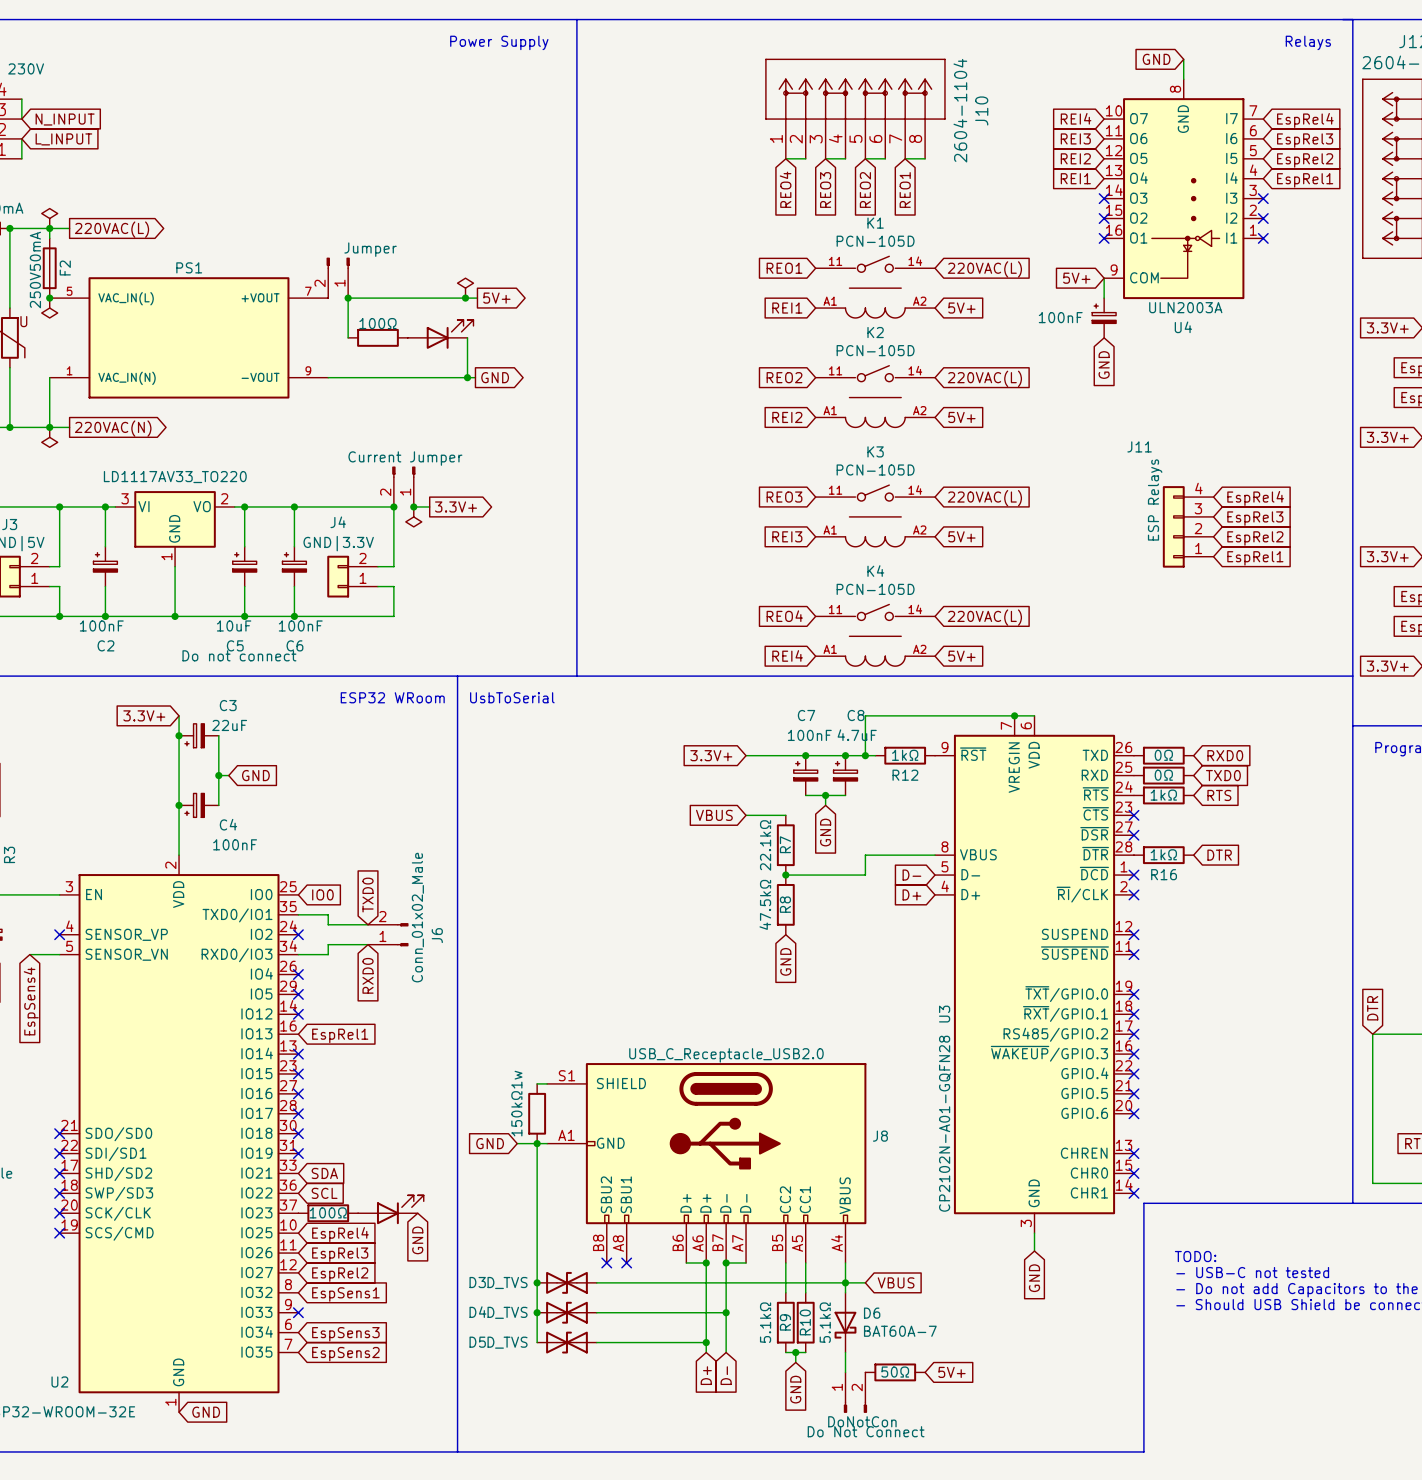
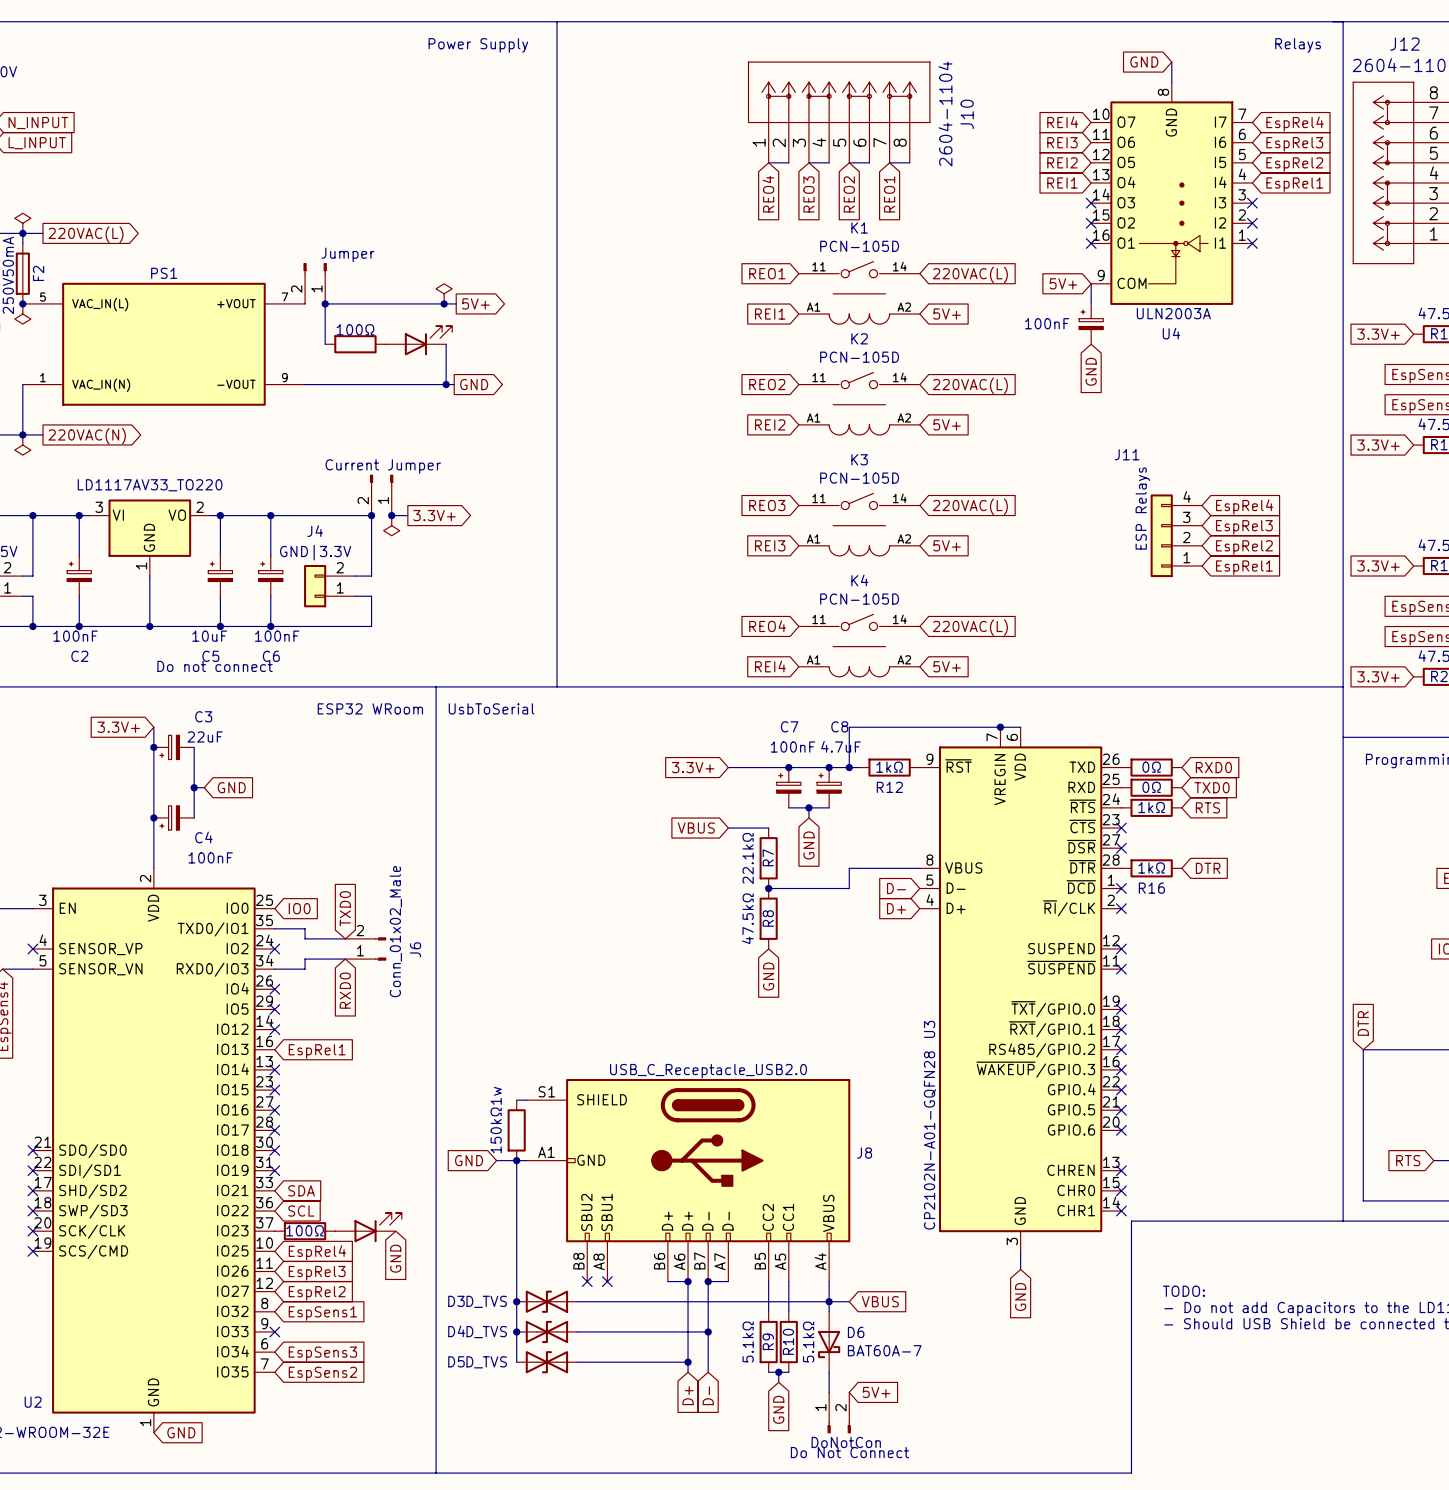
text: TODO: (1195, 1256) -> none
text: - USB-C not tested (1252, 1272) -> TODO: (1183, 1291)
part: 50Ω (895, 1372) -> none
global label position: 5V+ (951, 1372) -> 5V+ (876, 1392)

